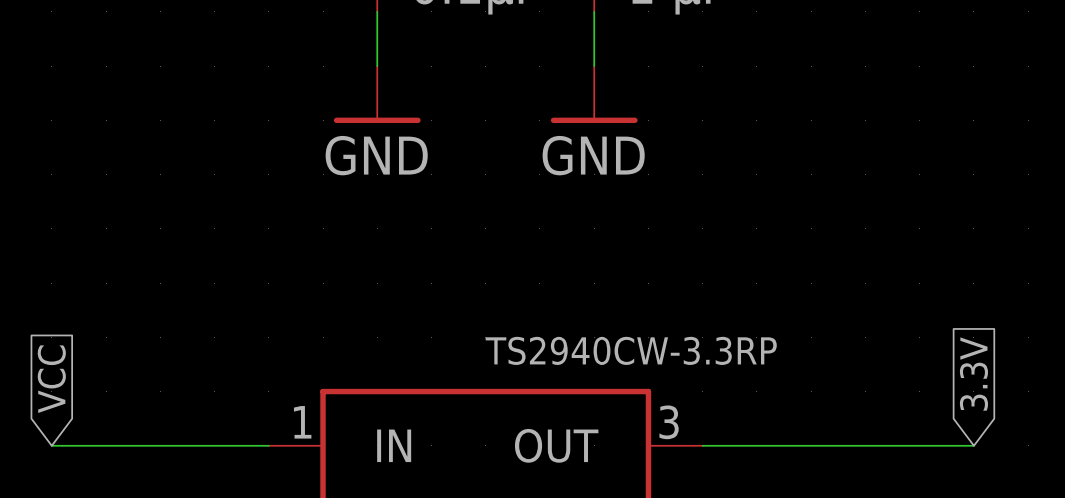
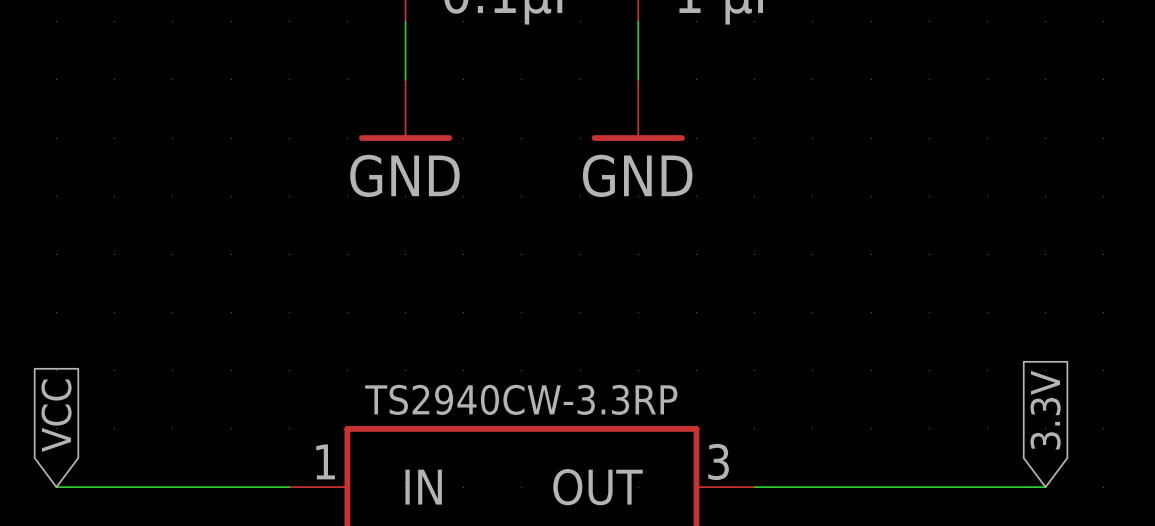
part value position: TS2940CW-3.3RP (631, 350) -> TS2940CW-3.3RP (521, 399)

